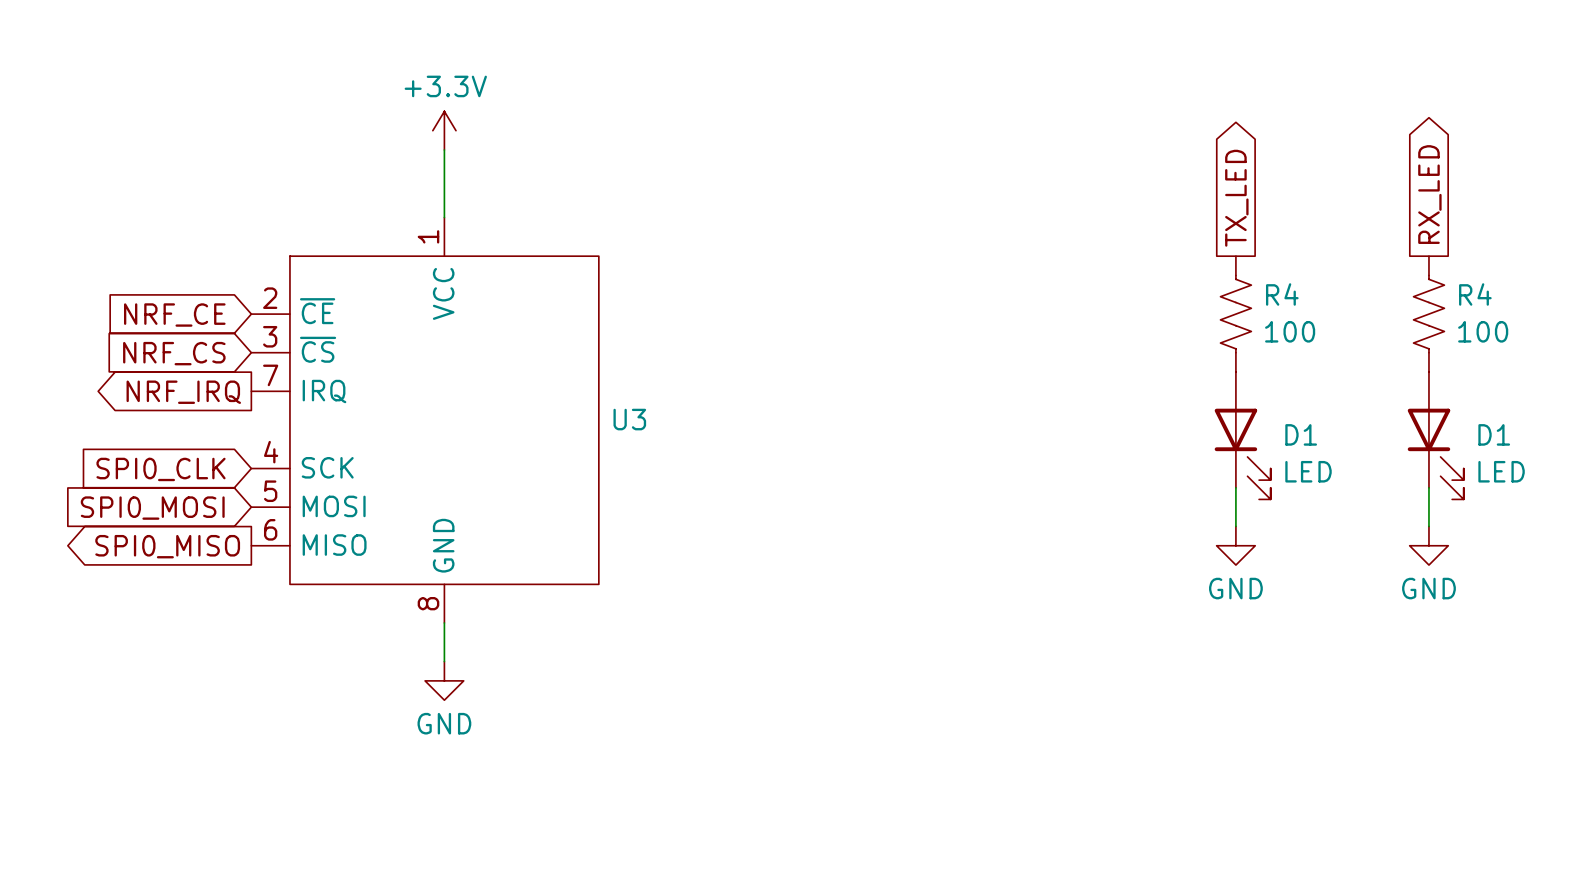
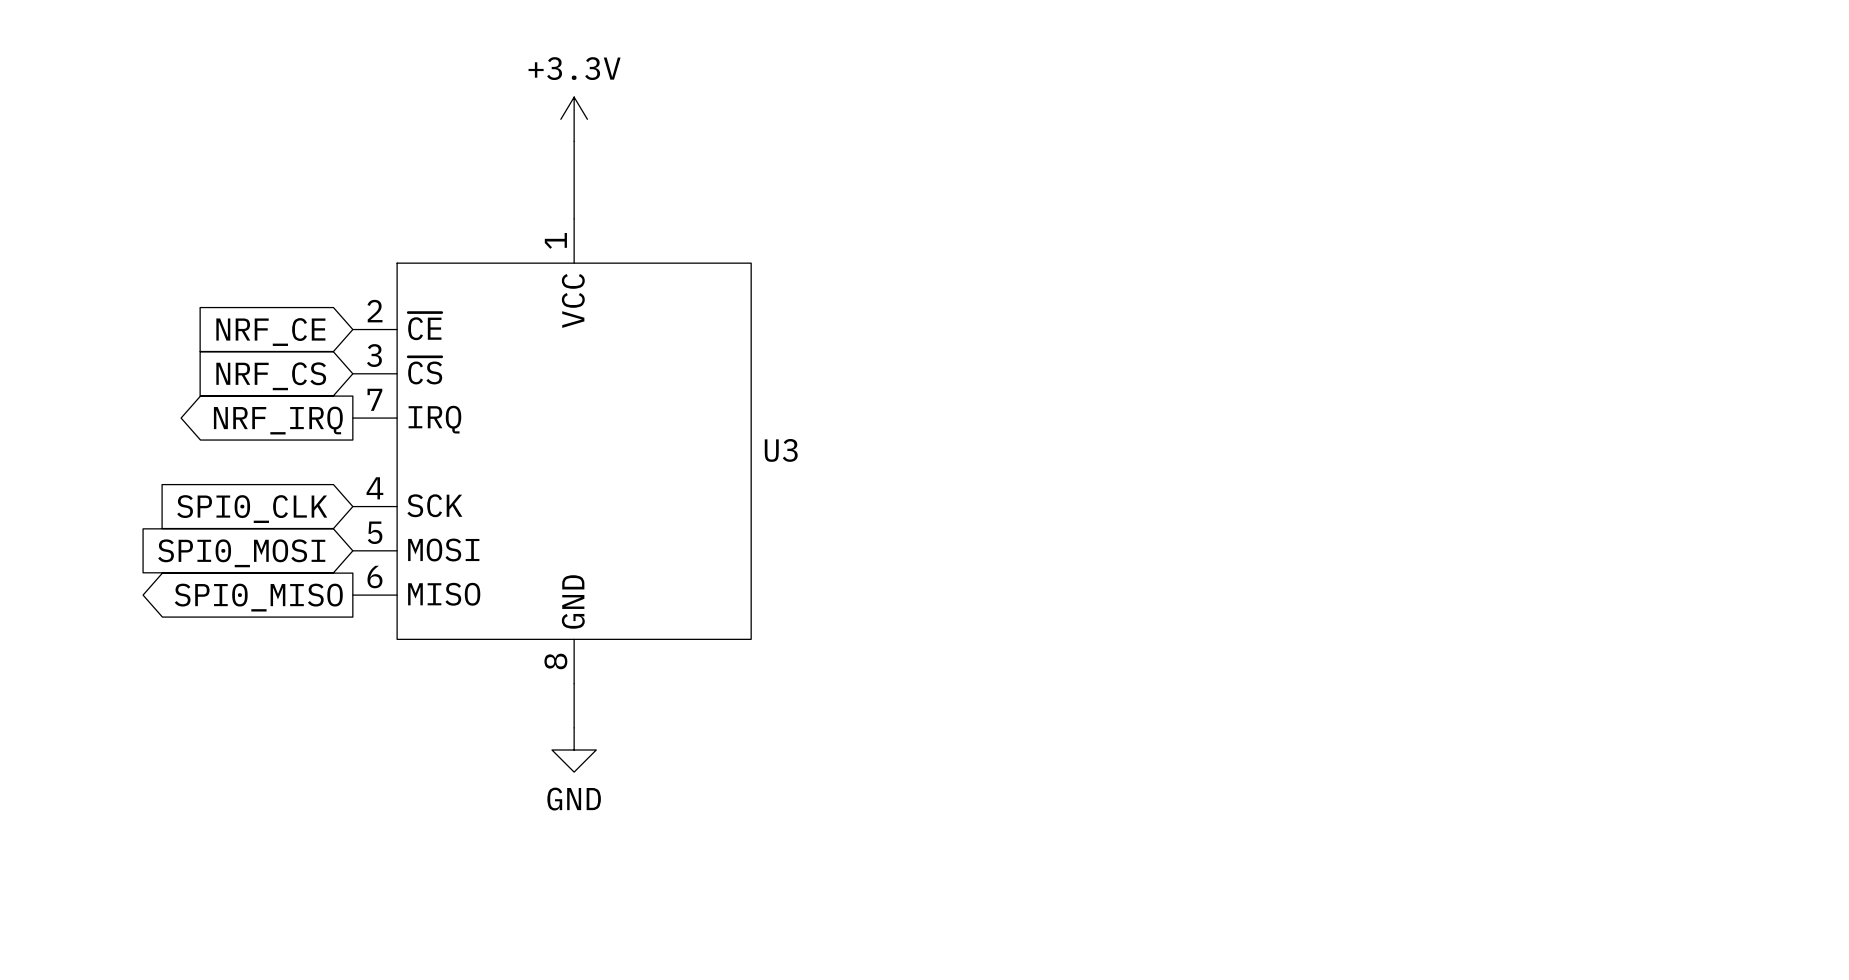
global label: RX_LED (1429, 194) -> none
global label: TX_LED (1236, 198) -> none
R4: 100 (1235, 314) -> none
R4: 100 (1428, 314) -> none
D1: LED (1242, 435) -> none
D1: LED (1435, 435) -> none
wire: (1235, 487) (1235, 526) -> none
wire: (1428, 487) (1428, 526) -> none
power symbol: GND (1235, 545) -> none
power symbol: GND (1428, 545) -> none

